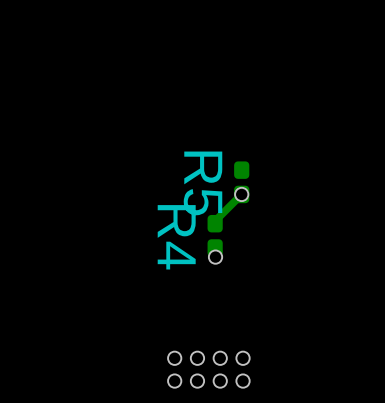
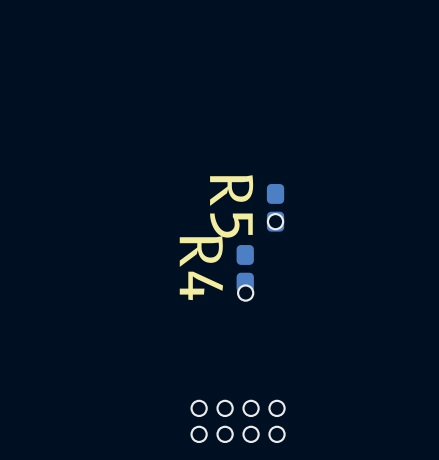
track: (241, 194) (215, 221) (215, 223) -> none

